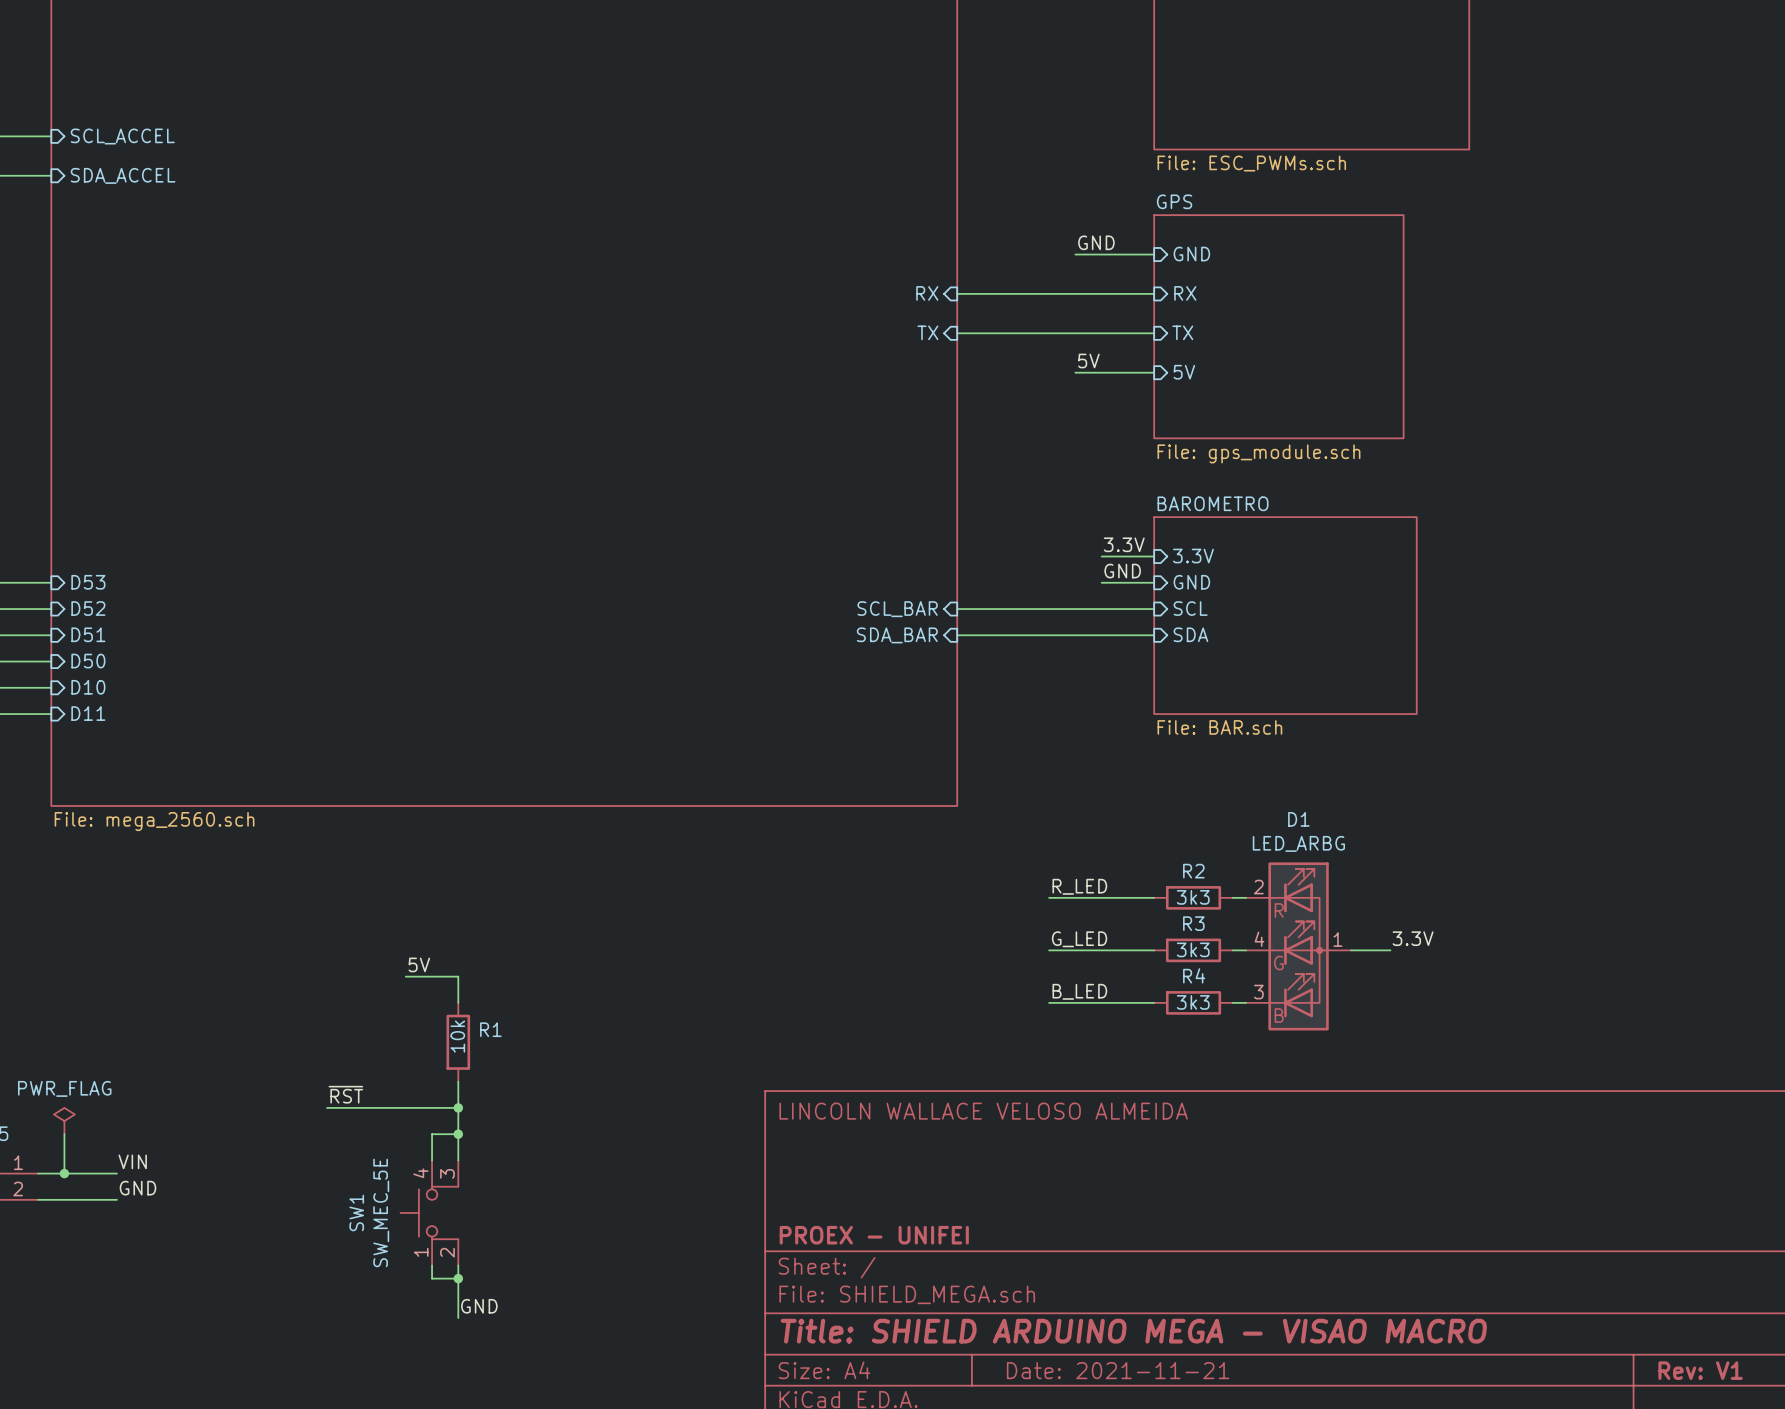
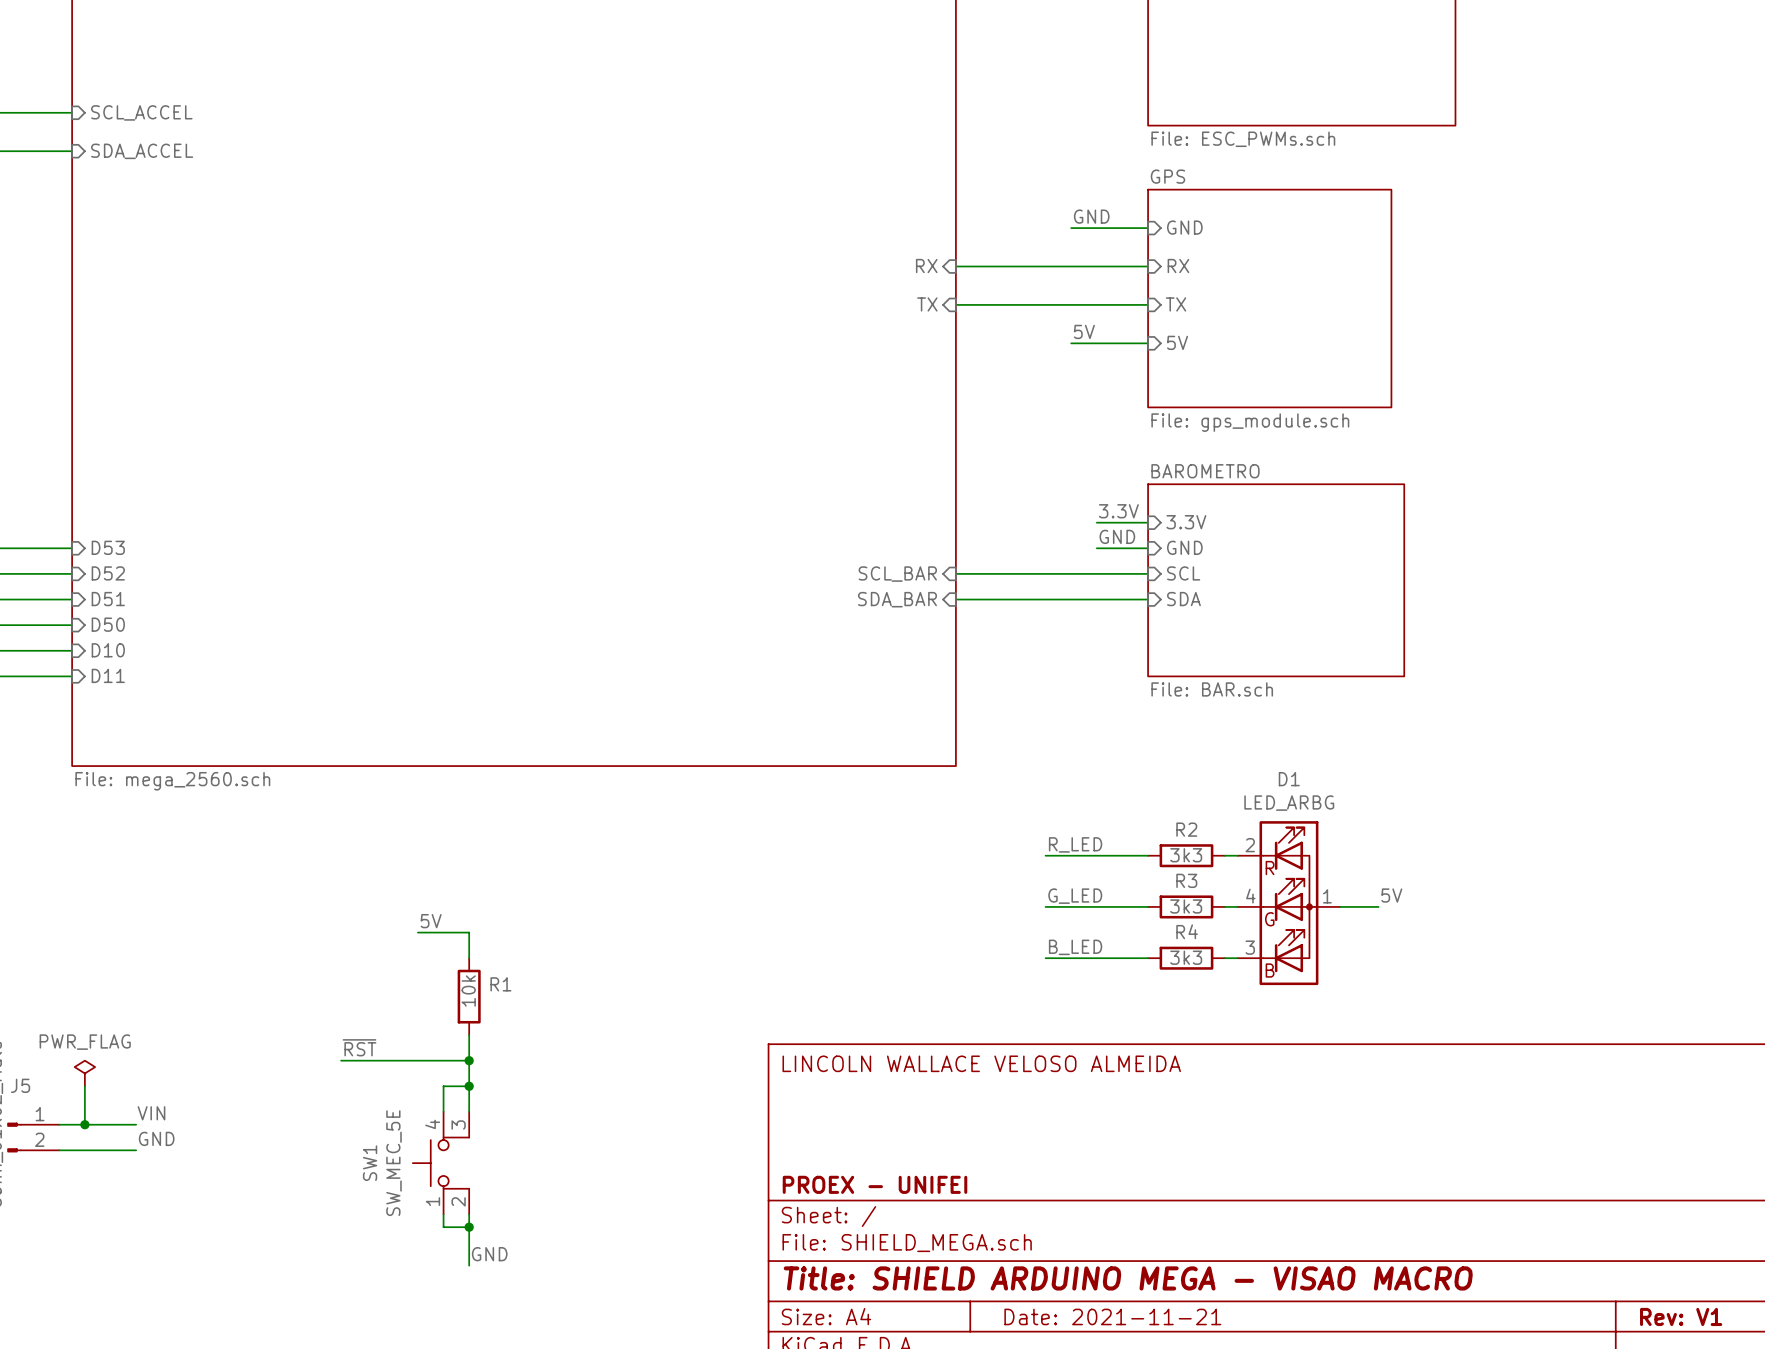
label: 3.3V (1413, 938) -> 5V (1391, 895)

